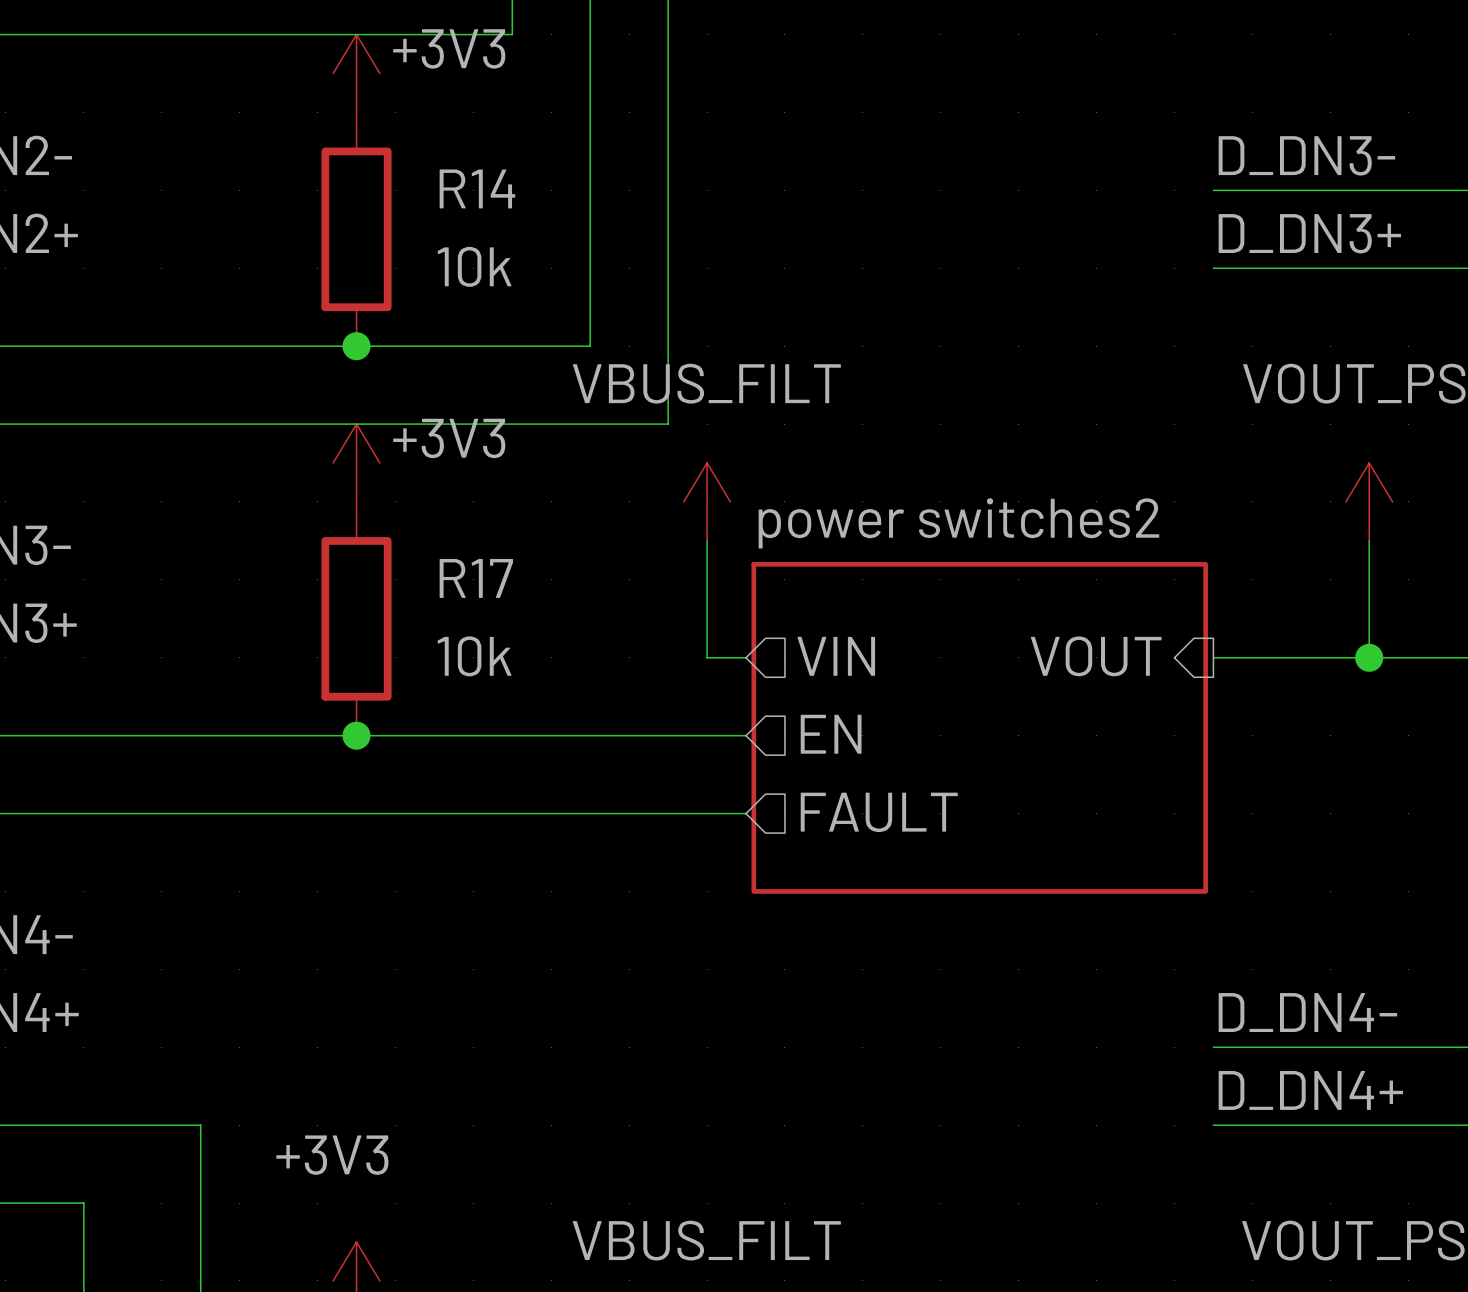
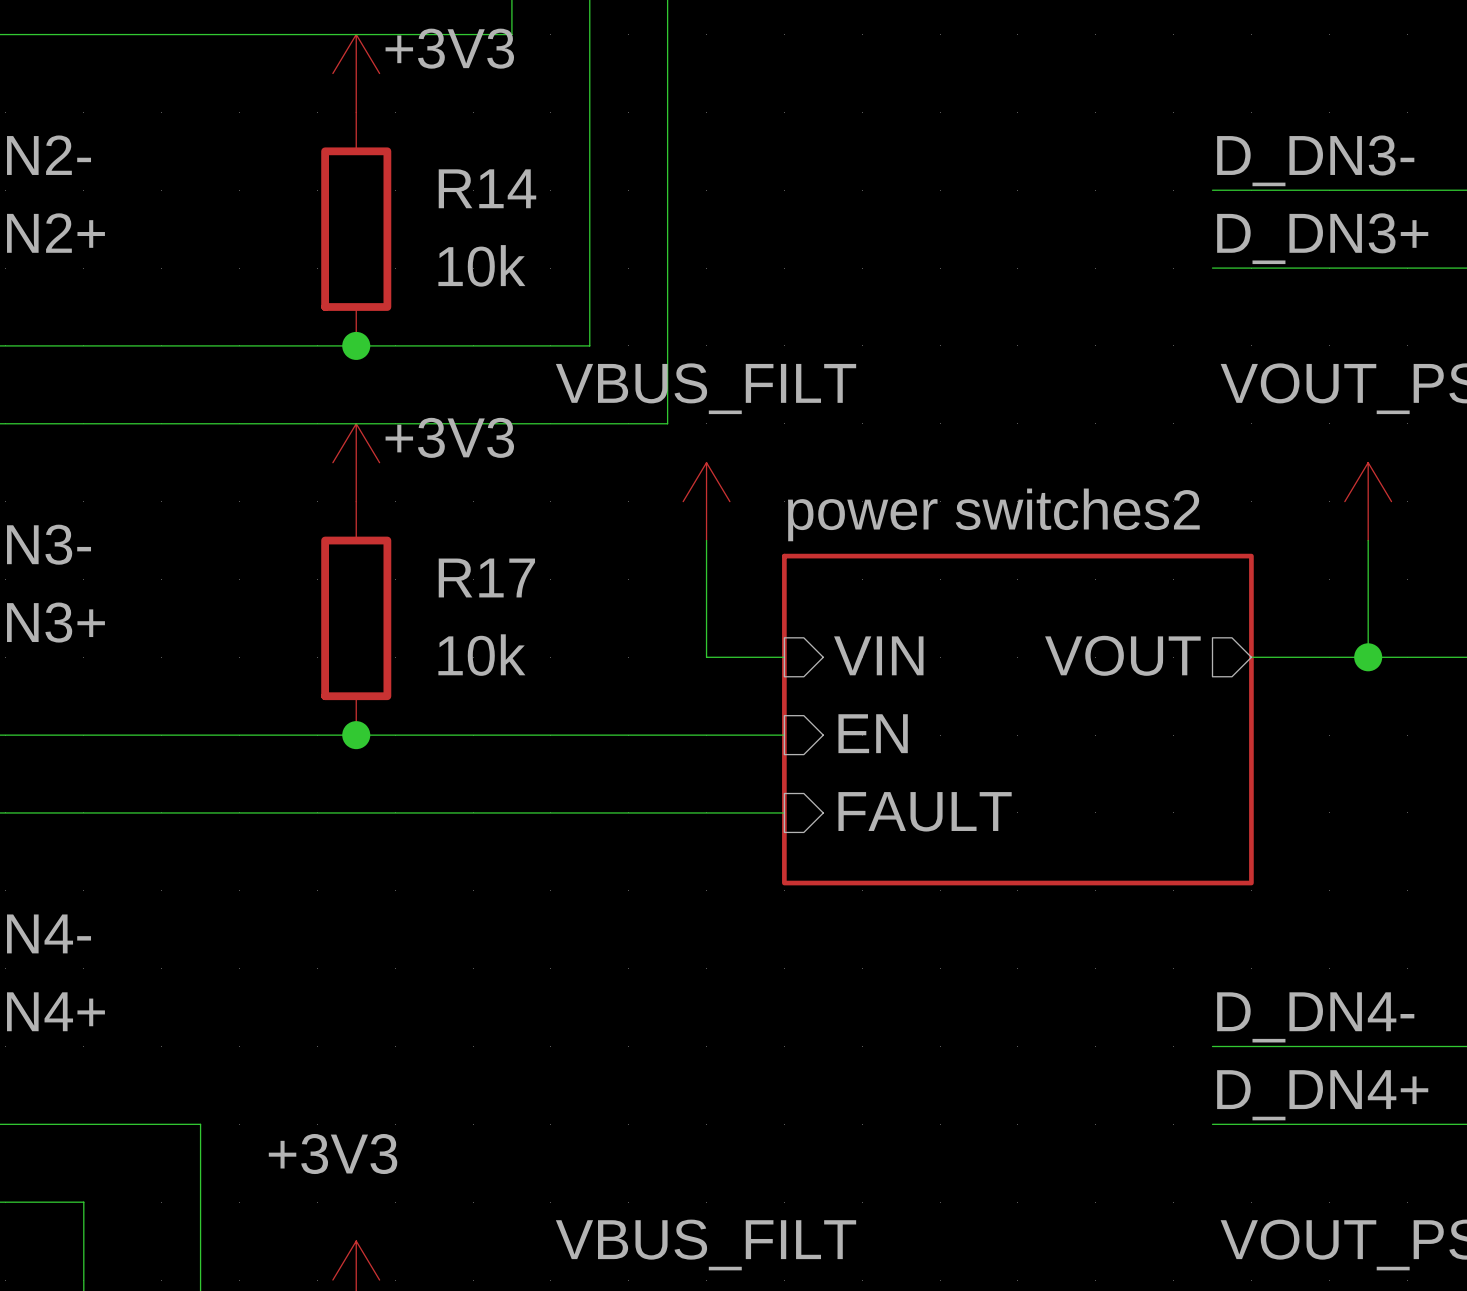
sheet power switches2 shape: [751, 561, 1208, 894] -> [782, 553, 1254, 886]
hierarchical label: VIN (836, 656) -> none
sheet pin: none -> VIN (878, 655)
hierarchical label: VOUT (1096, 656) -> none
sheet pin: none -> VOUT (1122, 655)
wire: (1213, 657) (1252, 657) -> (745, 657) (784, 657)
hierarchical label: EN (831, 734) -> none
sheet pin: none -> EN (873, 733)
wire: none -> (745, 735) (784, 735)
hierarchical label: FAULT (879, 812) -> none
sheet pin: none -> FAULT (925, 811)
wire: none -> (745, 812) (784, 812)

